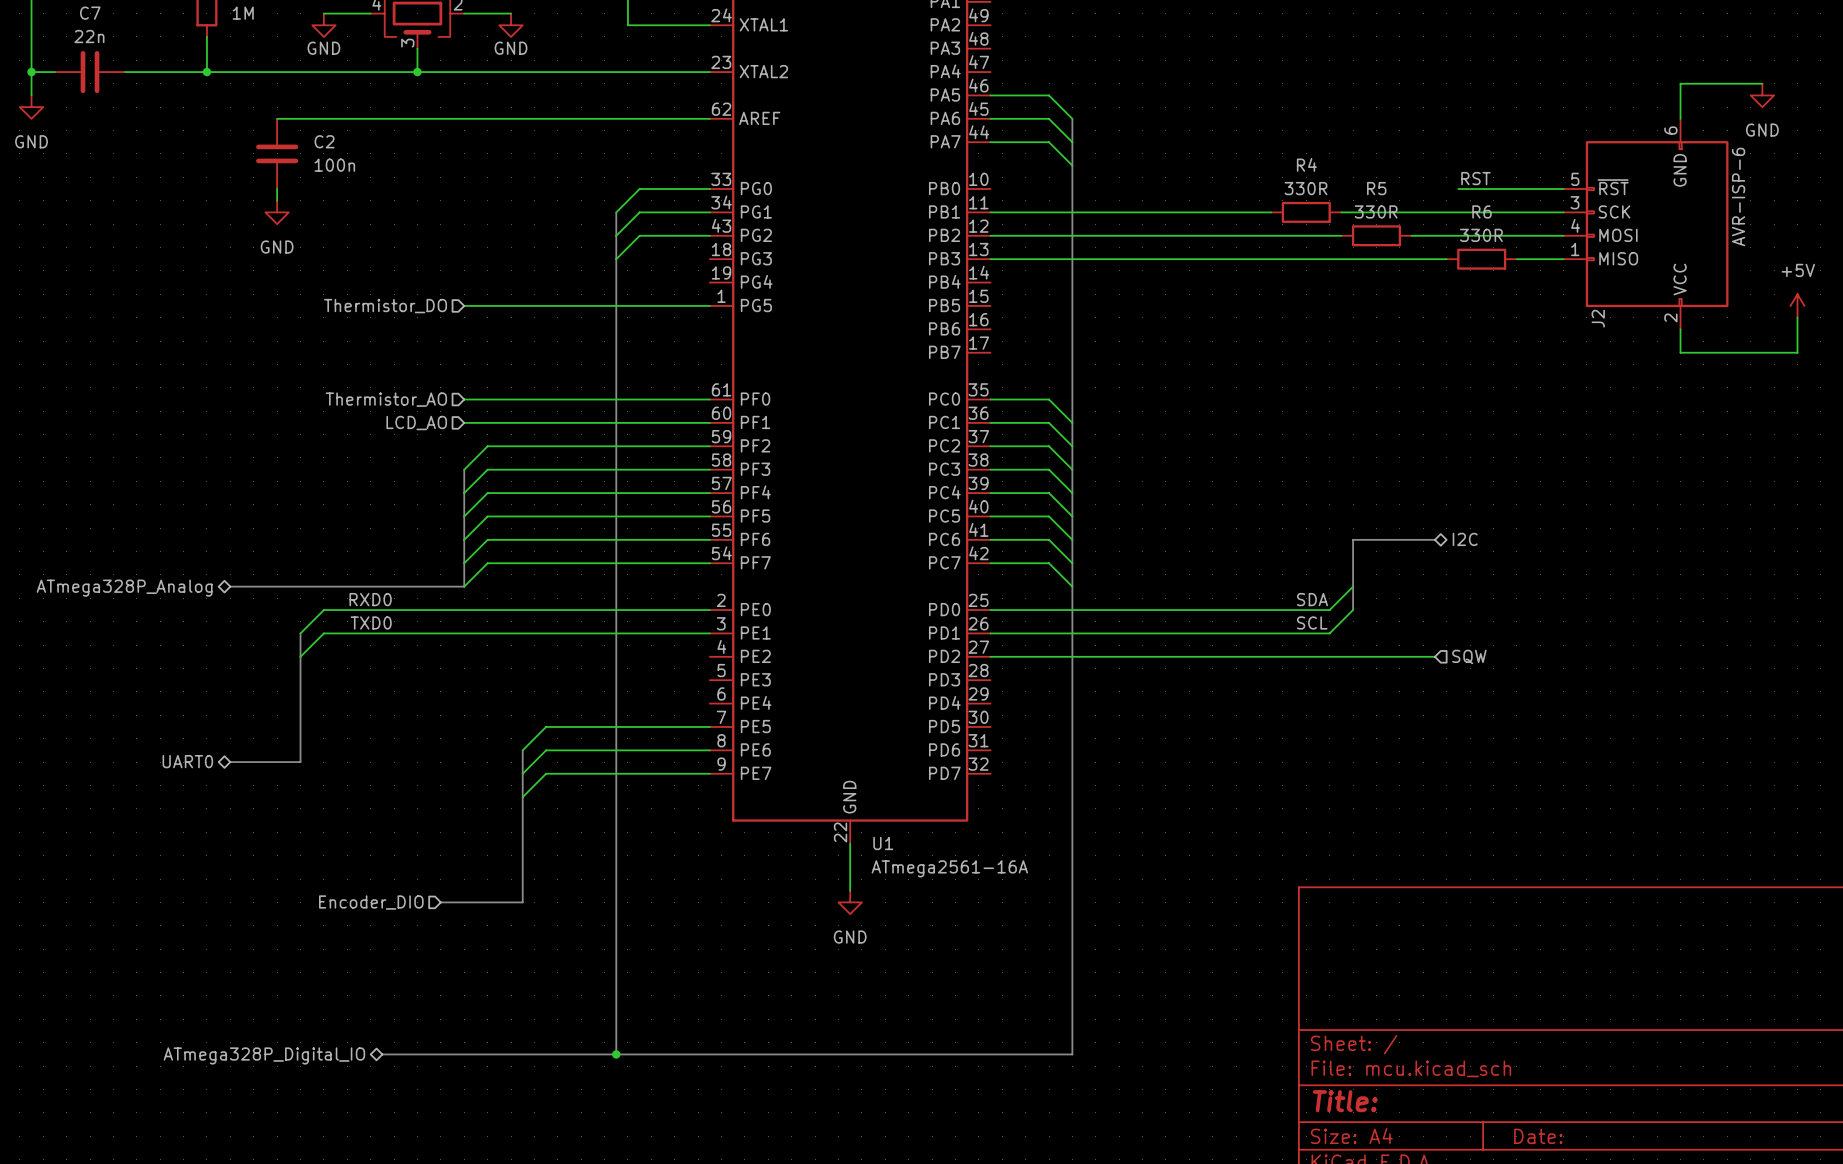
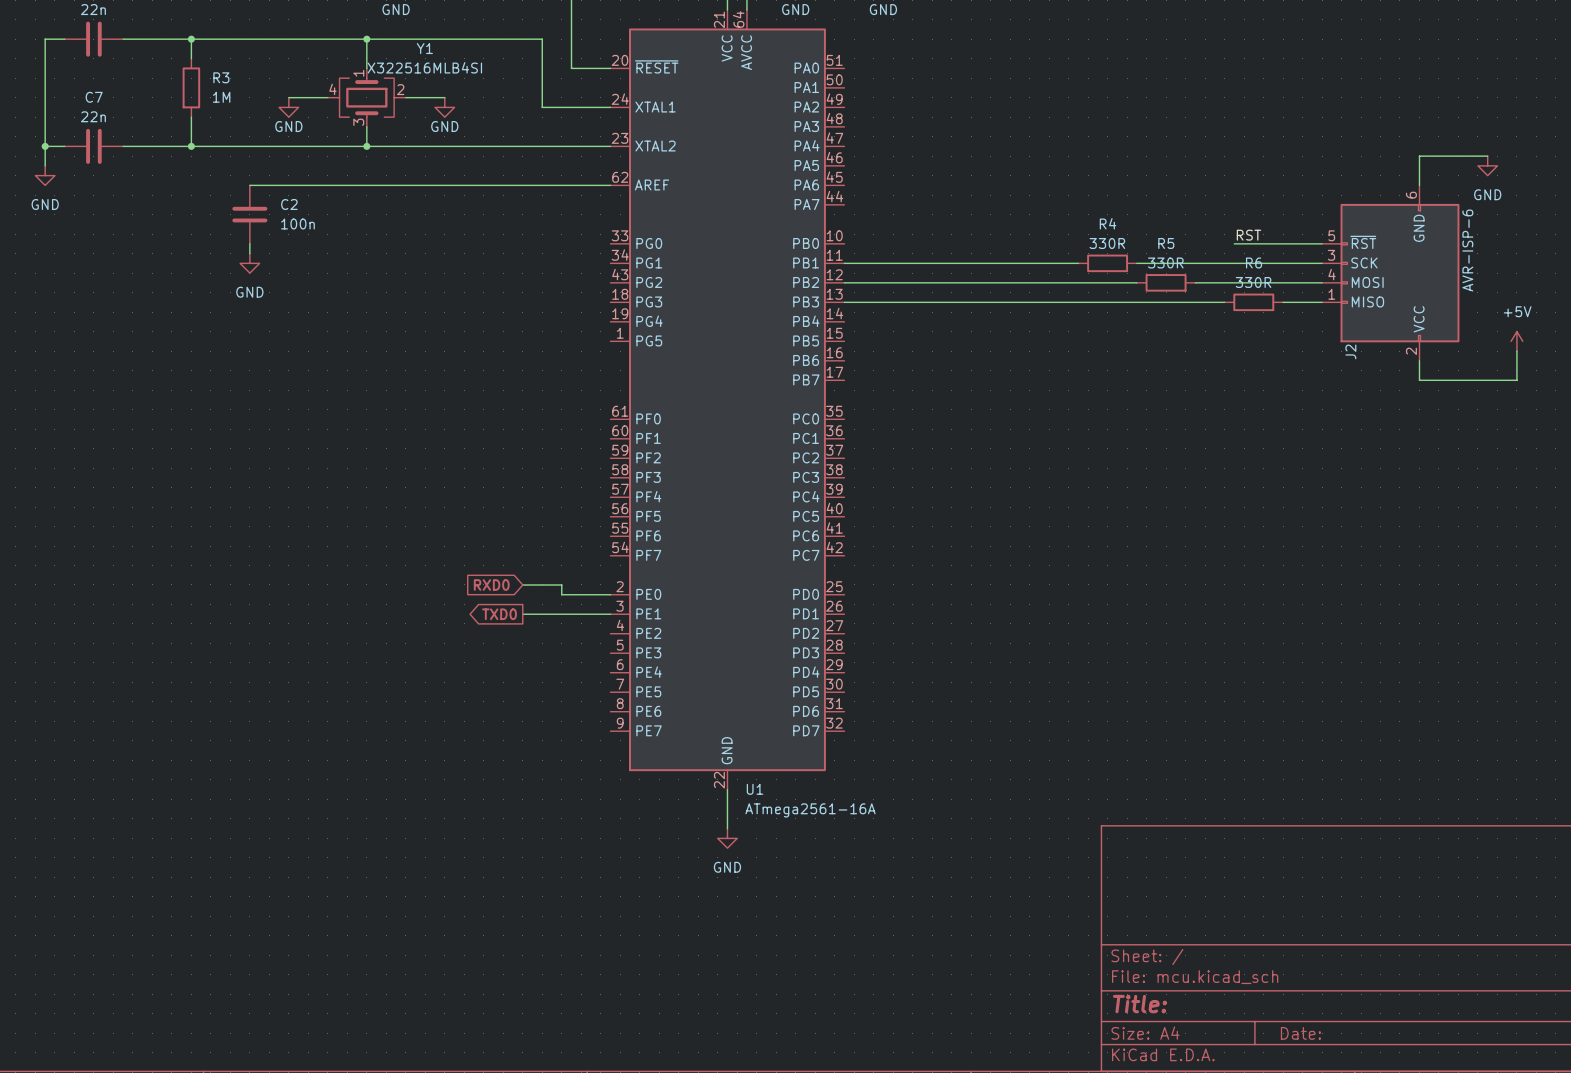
wire: (990, 95) (1049, 95) (1072, 118) -> none
wire: (990, 118) (1049, 118) (1072, 142) -> none
bus: (1072, 118) (1072, 1054) (382, 1054) -> none
wire: (990, 142) (1049, 142) (1072, 165) -> none
wire: (709, 189) (639, 189) (616, 212) -> none
bus: (616, 212) (616, 1054) -> none
wire: (709, 212) (639, 212) (616, 235) -> none
wire: (709, 235) (639, 235) (616, 259) -> none
wire: (464, 305) (709, 305) -> none
hierarchical label: Thermistor_DO (385, 306) -> none
hierarchical label: Thermistor_AO (386, 399) -> none
wire: (464, 399) (709, 399) -> none
wire: (990, 399) (1049, 399) (1072, 422) -> none
wire: (464, 422) (709, 422) -> none
wire: (990, 422) (1049, 422) (1072, 446) -> none
hierarchical label: LCD_AO (416, 423) -> none
wire: (709, 446) (487, 446) (464, 469) -> none
wire: (990, 446) (1049, 446) (1072, 469) -> none
bus: (464, 469) (464, 586) (230, 586) -> none
wire: (709, 469) (487, 469) (464, 493) -> none
wire: (990, 469) (1049, 469) (1072, 493) -> none
wire: (709, 493) (487, 493) (464, 516) -> none
wire: (990, 493) (1049, 493) (1072, 516) -> none
wire: (709, 516) (487, 516) (464, 539) -> none
wire: (990, 516) (1049, 516) (1072, 539) -> none
wire: (709, 539) (487, 539) (464, 563) -> none
wire: (990, 539) (1049, 539) (1072, 563) -> none
bus: (1434, 539) (1353, 539) (1353, 610) -> none
hierarchical label: I2C (1465, 539) -> none
wire: (709, 563) (487, 563) (464, 586) -> none
wire: (990, 563) (1049, 563) (1072, 586) -> none
wire: (1353, 586) (1329, 610) (990, 610) -> none
hierarchical label: ATmega328P_Analog (124, 588) -> none
global label: none -> RXD0 (491, 584)
label: RXD0 (370, 599) -> none
label: SDA (1312, 599) -> none
wire: (651, 610) (323, 610) (300, 633) -> (561, 594) (561, 584) (522, 584)
wire: (1353, 610) (1329, 633) (990, 633) -> none
label: TXD0 (371, 622) -> none
label: SCL (1312, 622) -> none
bus: (300, 633) (300, 762) (230, 762) -> none
global label: none -> TXD0 (499, 614)
wire: (604, 633) (323, 633) (300, 656) -> none
wire: (990, 656) (1434, 656) -> none
hierarchical label: SQW (1469, 656) -> none
wire: (709, 726) (546, 726) (522, 750) -> none
bus: (522, 750) (522, 902) (440, 902) -> none
wire: (709, 750) (546, 750) (522, 773) -> none
hierarchical label: UART0 (187, 761) -> none
wire: (709, 773) (546, 773) (522, 797) -> none
hierarchical label: Encoder_DIO (371, 902) -> none
junction: (616, 1054) -> none
hierarchical label: ATmega328P_Digital_IO (264, 1055) -> none

